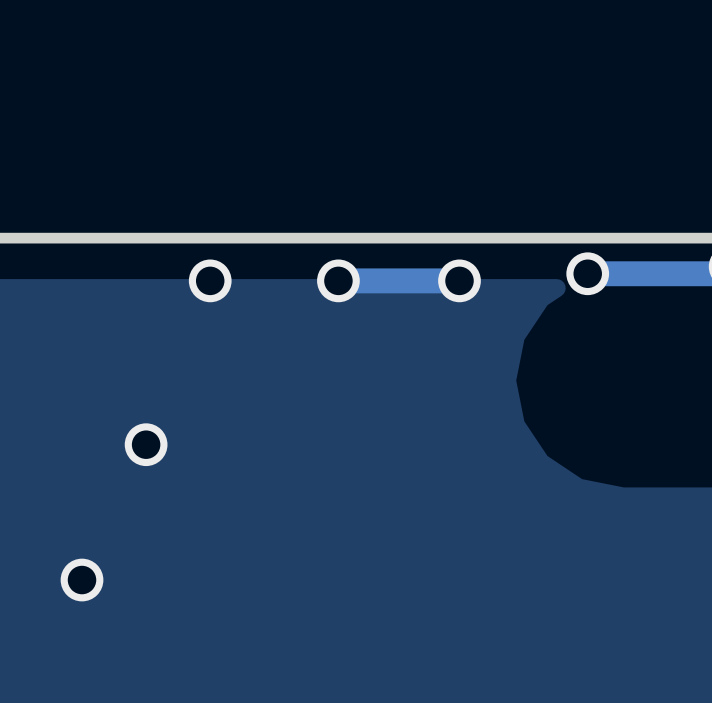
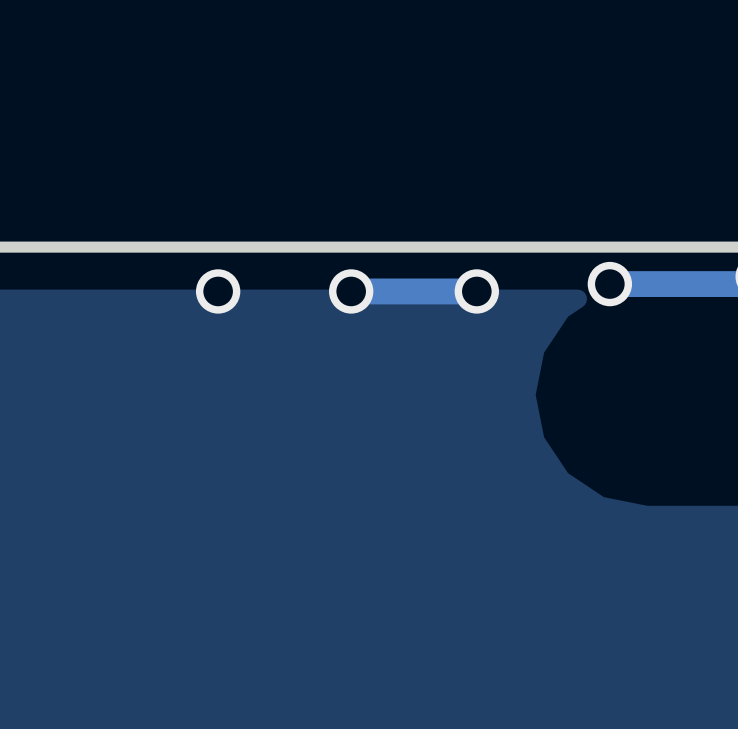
via: (146, 444) -> none
via: (82, 580) -> none

